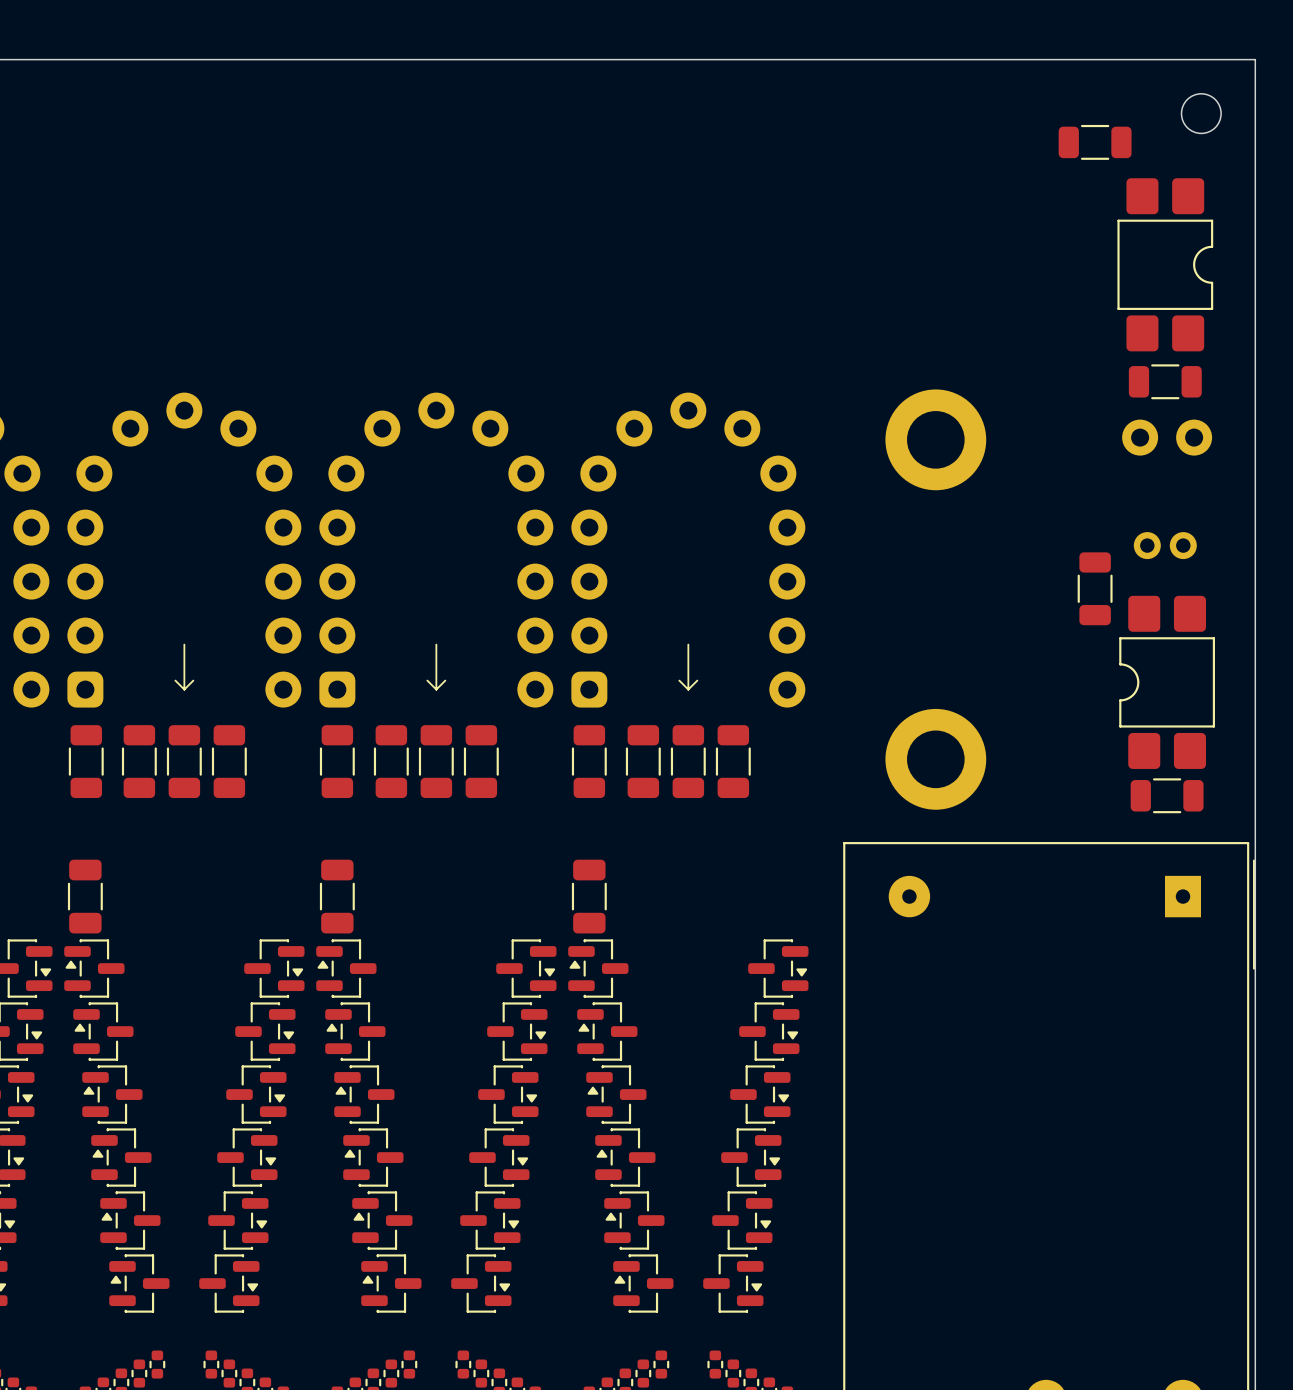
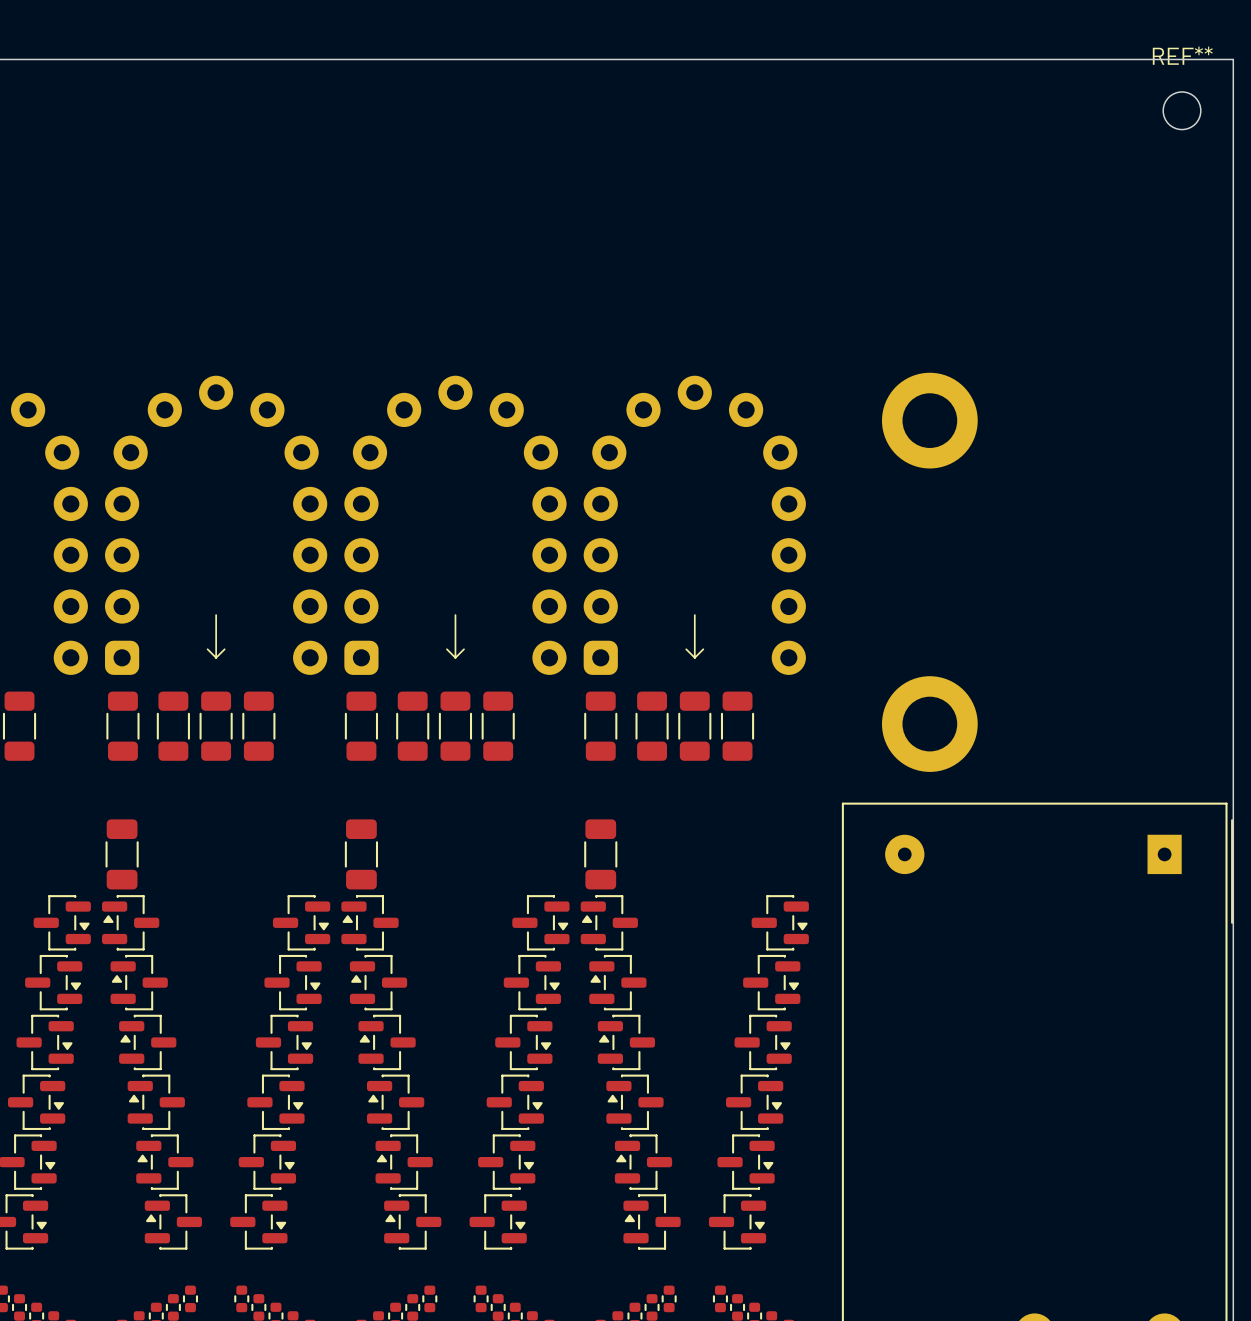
REF** name: none -> REF** (1182, 55)
part: (1095, 142) -> none
part: (1165, 264) -> none
part: (1165, 381) -> none
part: (1167, 437) -> none
part: (1165, 545) -> none
part: (1095, 588) -> none
part: (1167, 682) -> none
part: (1167, 795) -> none

